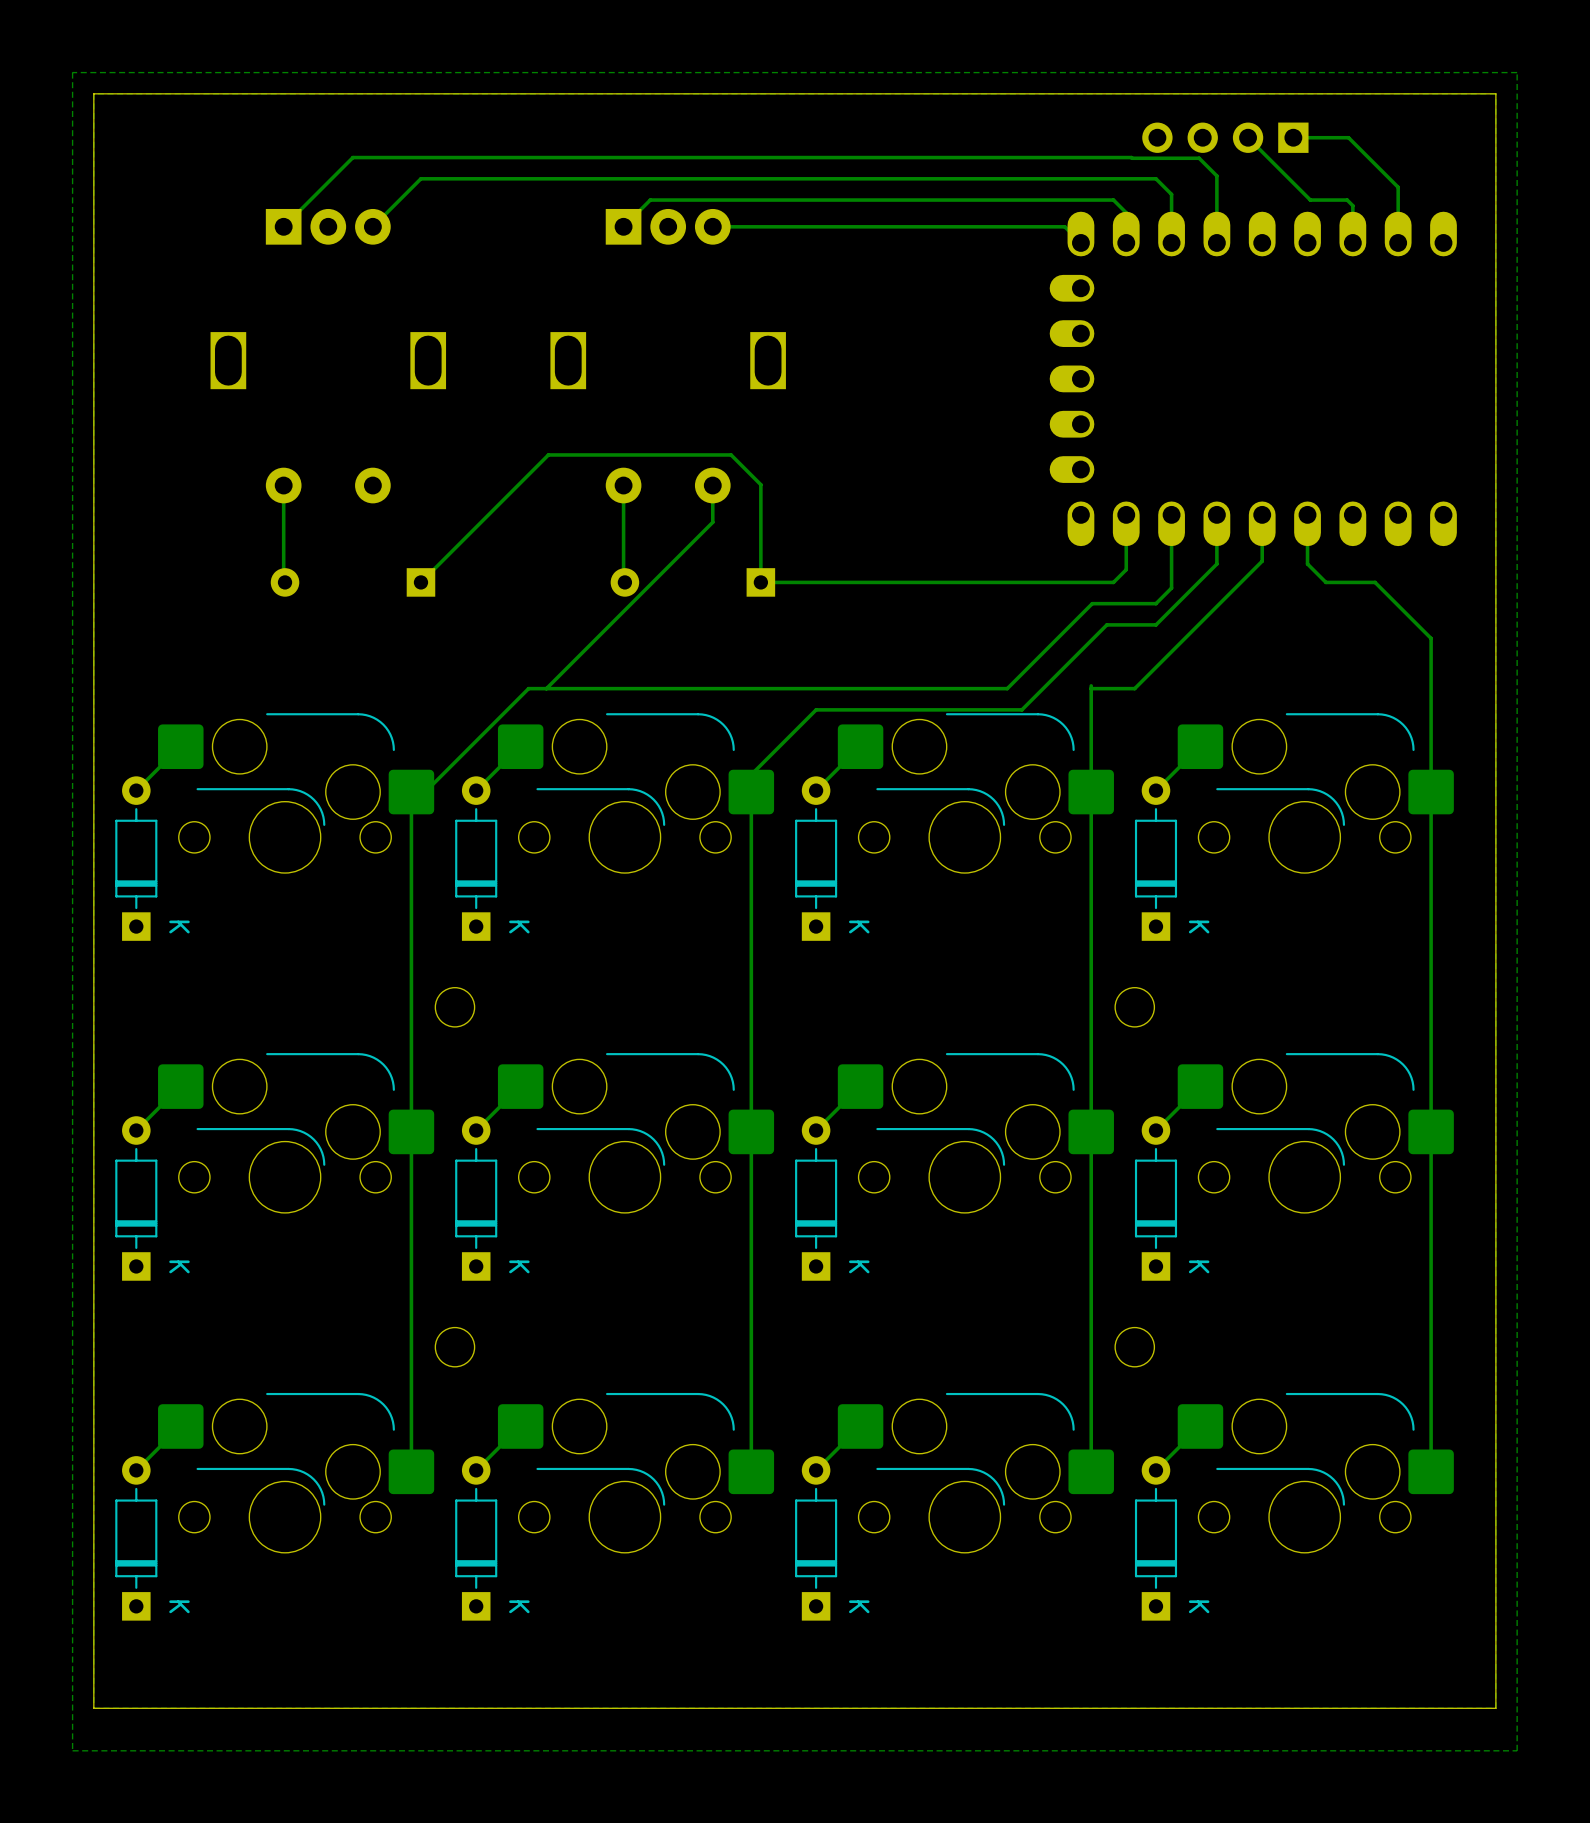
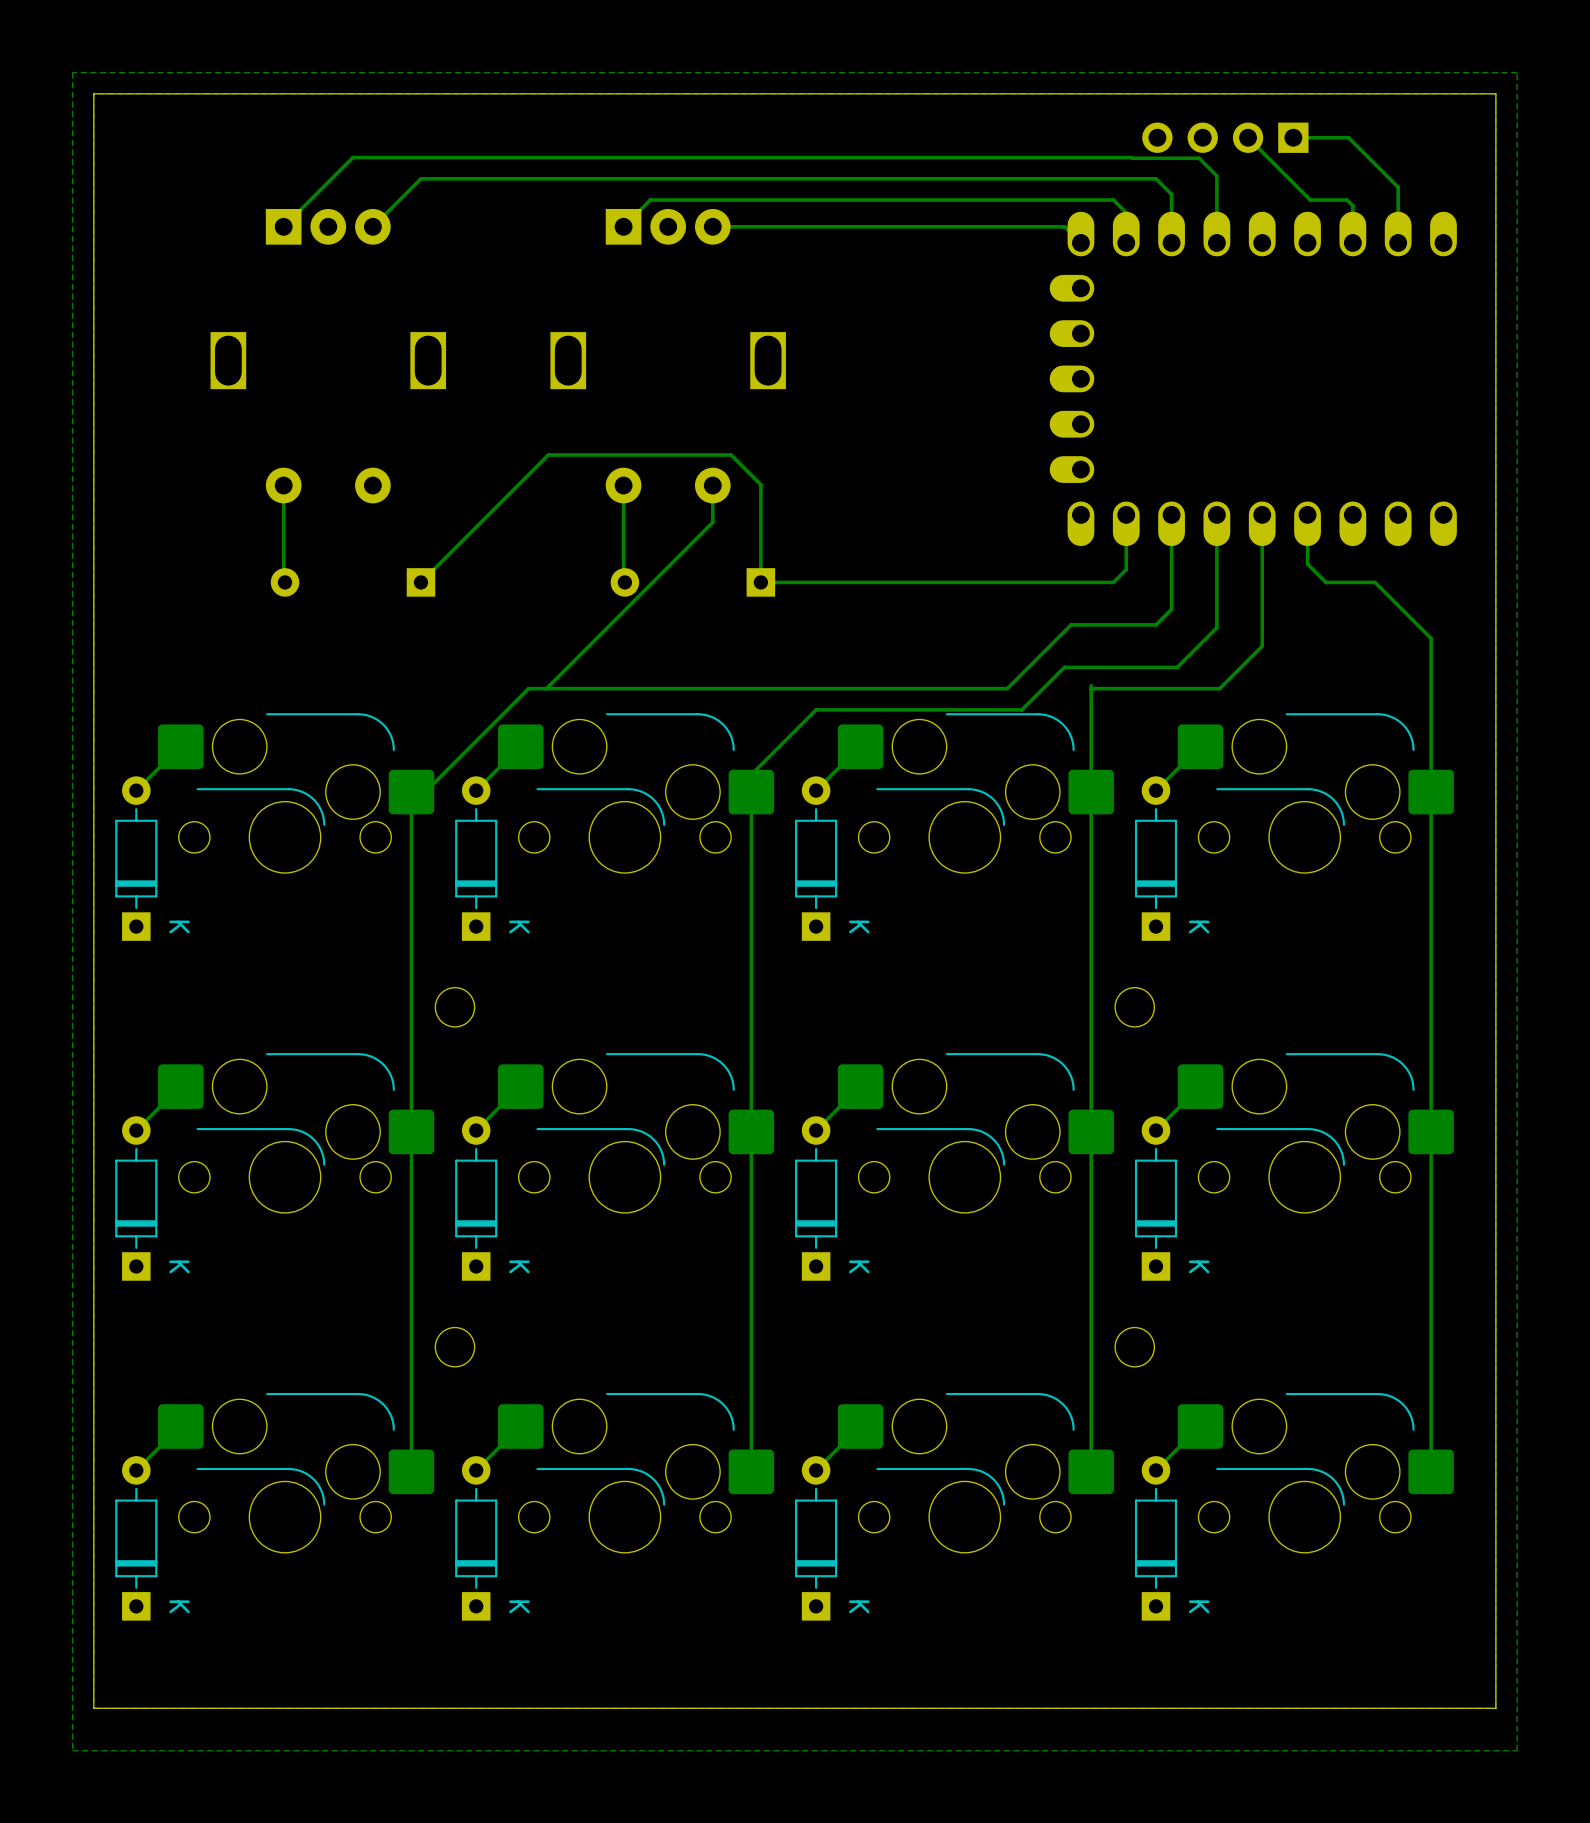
track: (1262, 561) (1134, 688) -> (1262, 561) (1262, 646) (1219, 688) (1134, 688)
track: (1216, 564) (1171, 609) -> (1171, 588) (1171, 609)
track: none -> (1216, 564) (1216, 627) (1177, 667) (1064, 667)
track: (1171, 588) (1156, 603) (1092, 603) (1071, 624) -> none
track: (1106, 624) (1064, 667) -> (1106, 624) (1071, 624)

